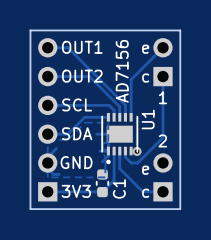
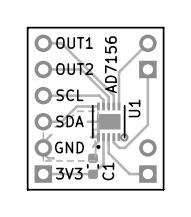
text: e (145, 49) -> none
text: c (145, 78) -> none
text: 1 (162, 97) -> none
text: 2 (162, 140) -> none
text: e (145, 170) -> none
text: c (145, 193) -> none

